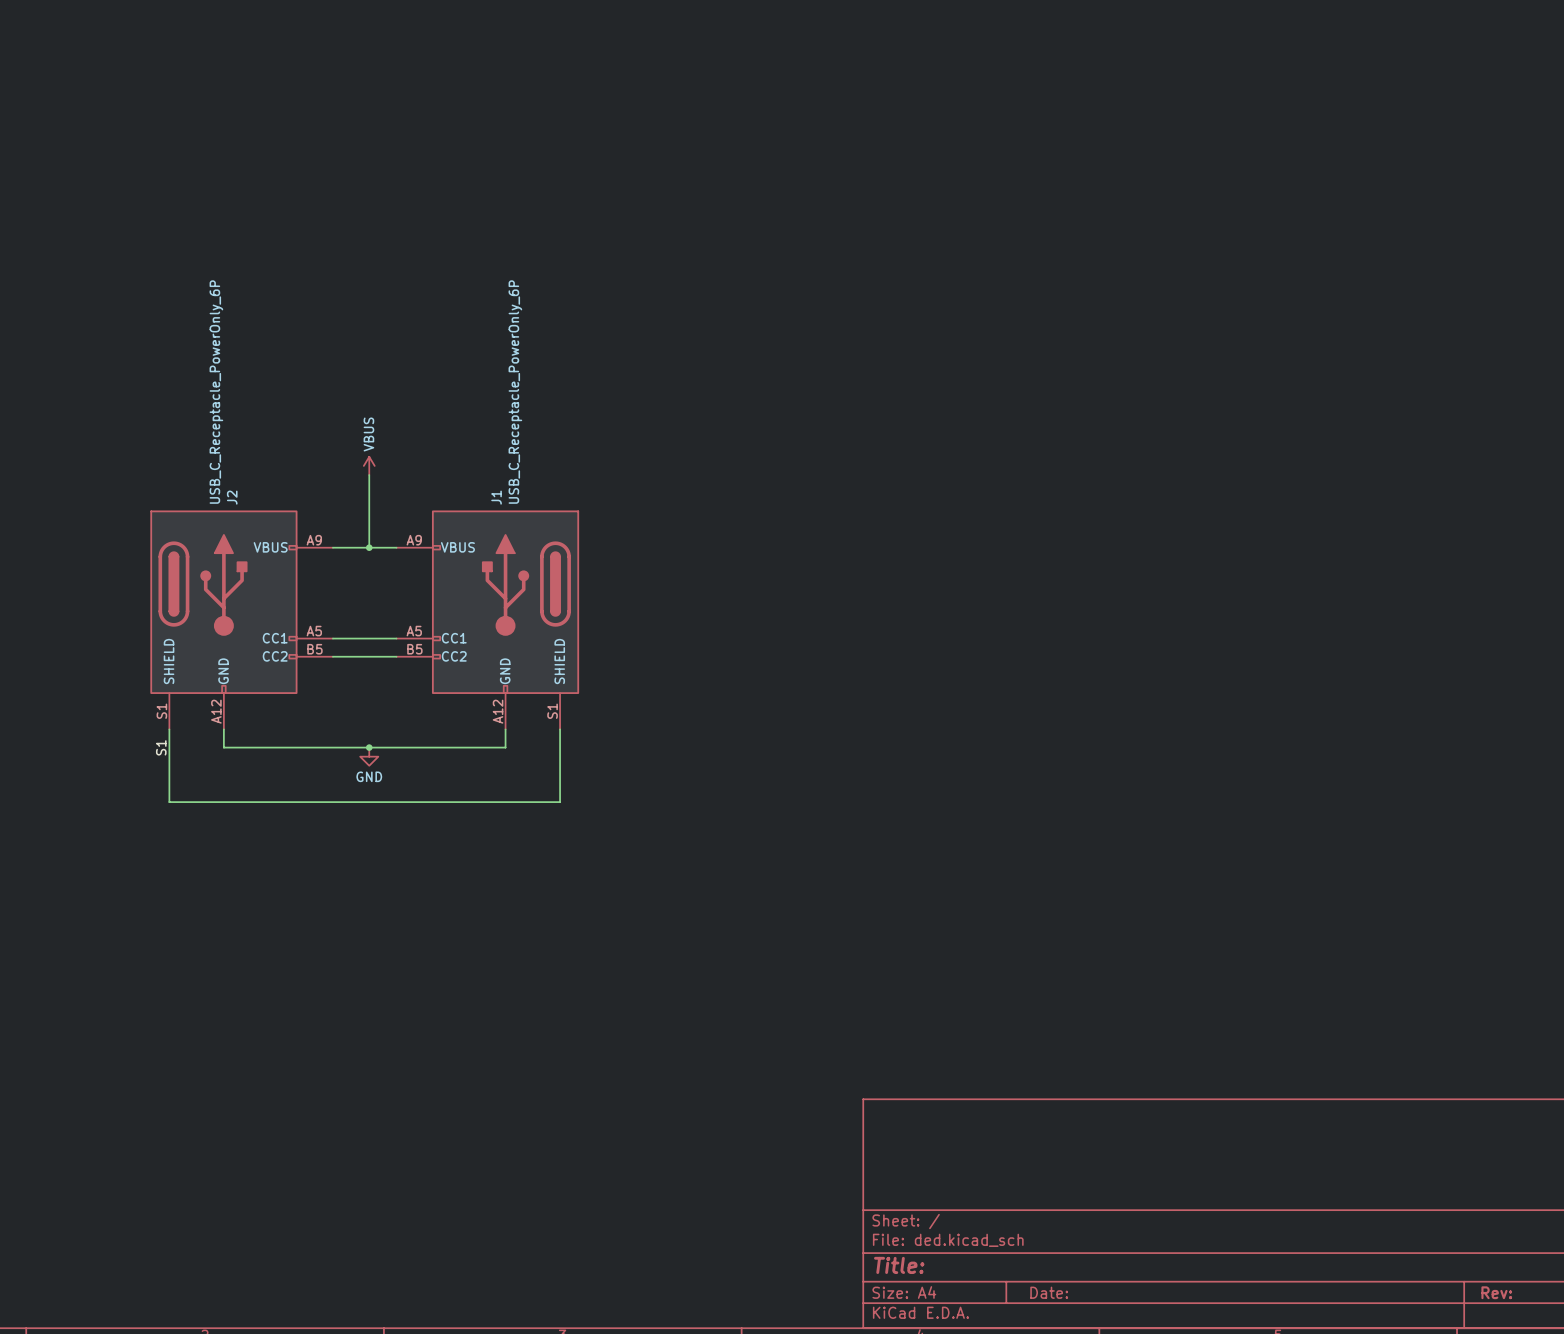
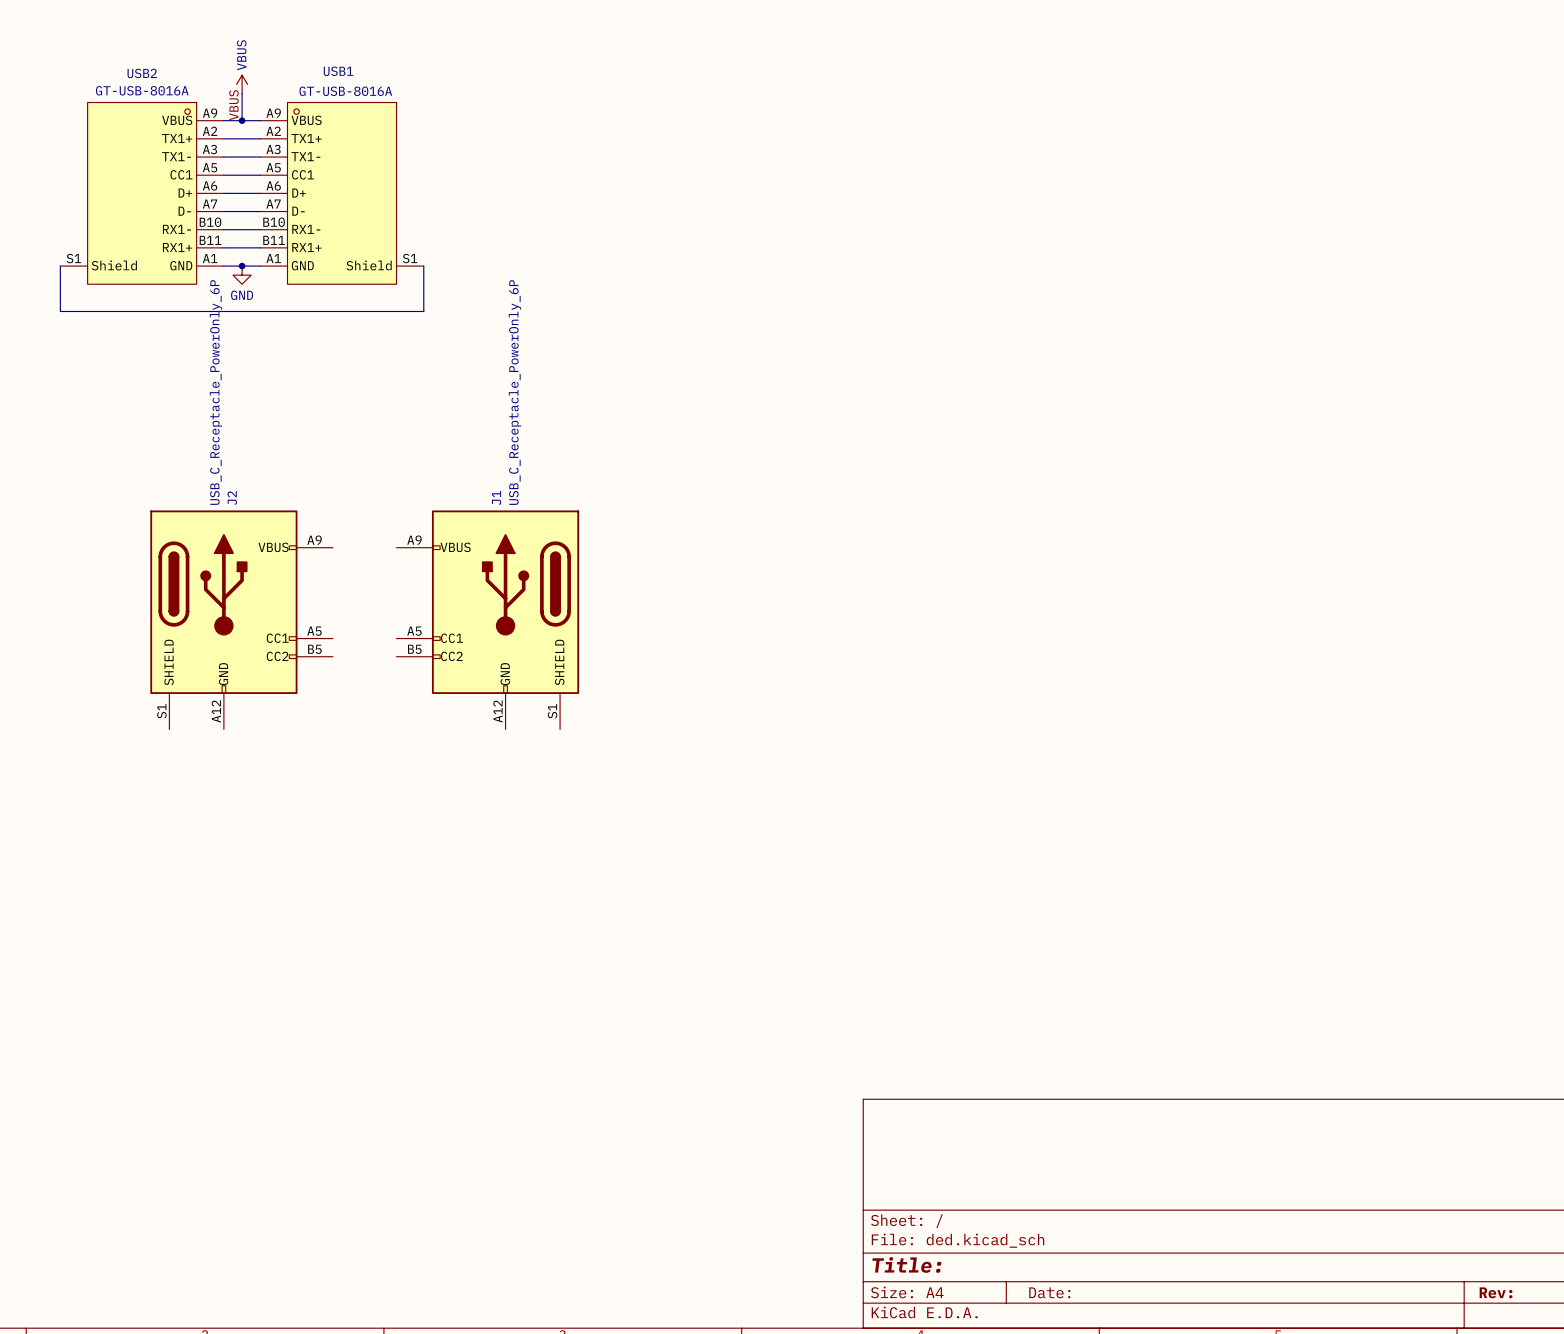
power symbol: none -> VBUS (242, 84)
wire: none -> (242, 93) (242, 120)
label: none -> VBUS (233, 105)
wire: none -> (223, 120) (260, 120)
junction: none -> (242, 120)
wire: none -> (223, 138) (260, 138)
wire: none -> (223, 157) (260, 157)
wire: none -> (223, 175) (260, 175)
USB2: none -> GT-USB-8016A (142, 193)
wire: none -> (223, 193) (260, 193)
USB1: none -> GT-USB-8016A (342, 193)
wire: none -> (223, 211) (260, 211)
wire: none -> (223, 229) (260, 229)
wire: none -> (223, 247) (260, 247)
wire: none -> (60, 266) (60, 311) (423, 311) (423, 266)
wire: none -> (223, 266) (260, 266)
junction: none -> (242, 266)
power symbol: none -> GND (242, 275)
power symbol: VBUS (369, 465) -> none
wire: (369, 475) (369, 547) -> none
wire: (332, 547) (396, 547) -> none
junction: (369, 547) -> none
wire: (332, 638) (396, 638) -> none
wire: (332, 656) (396, 656) -> none
wire: (169, 729) (169, 802) (560, 802) (560, 729) -> none
wire: (223, 729) (223, 747) (505, 747) (505, 729) -> none
label: S1 (161, 747) -> none
junction: (369, 747) -> none
power symbol: GND (369, 756) -> none

